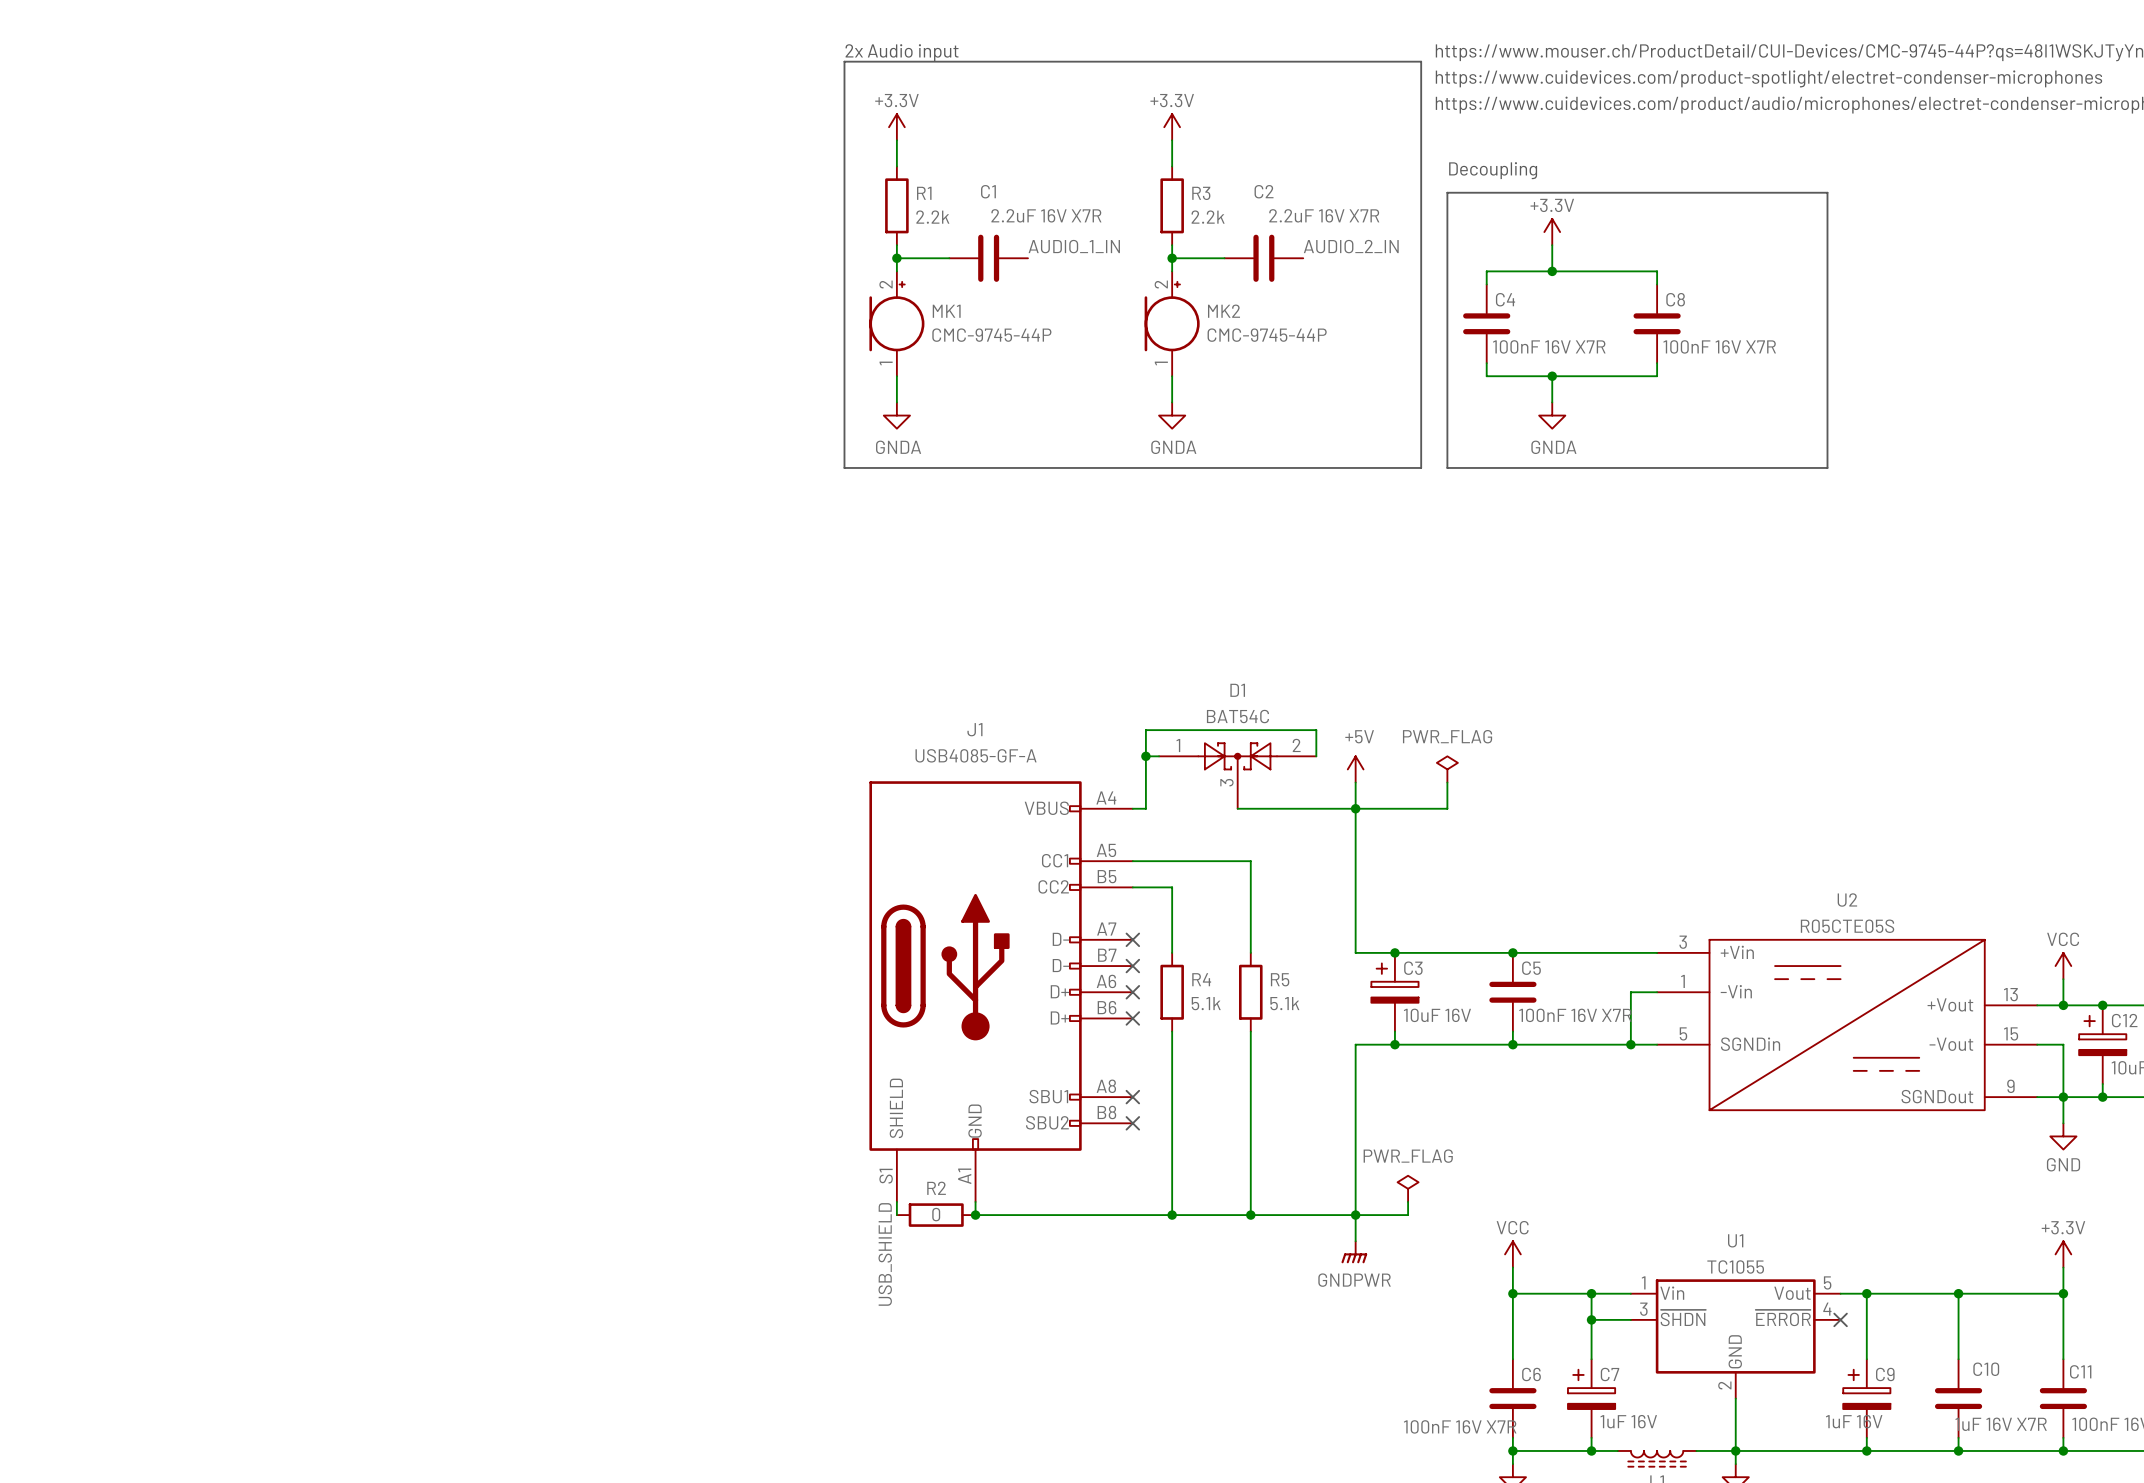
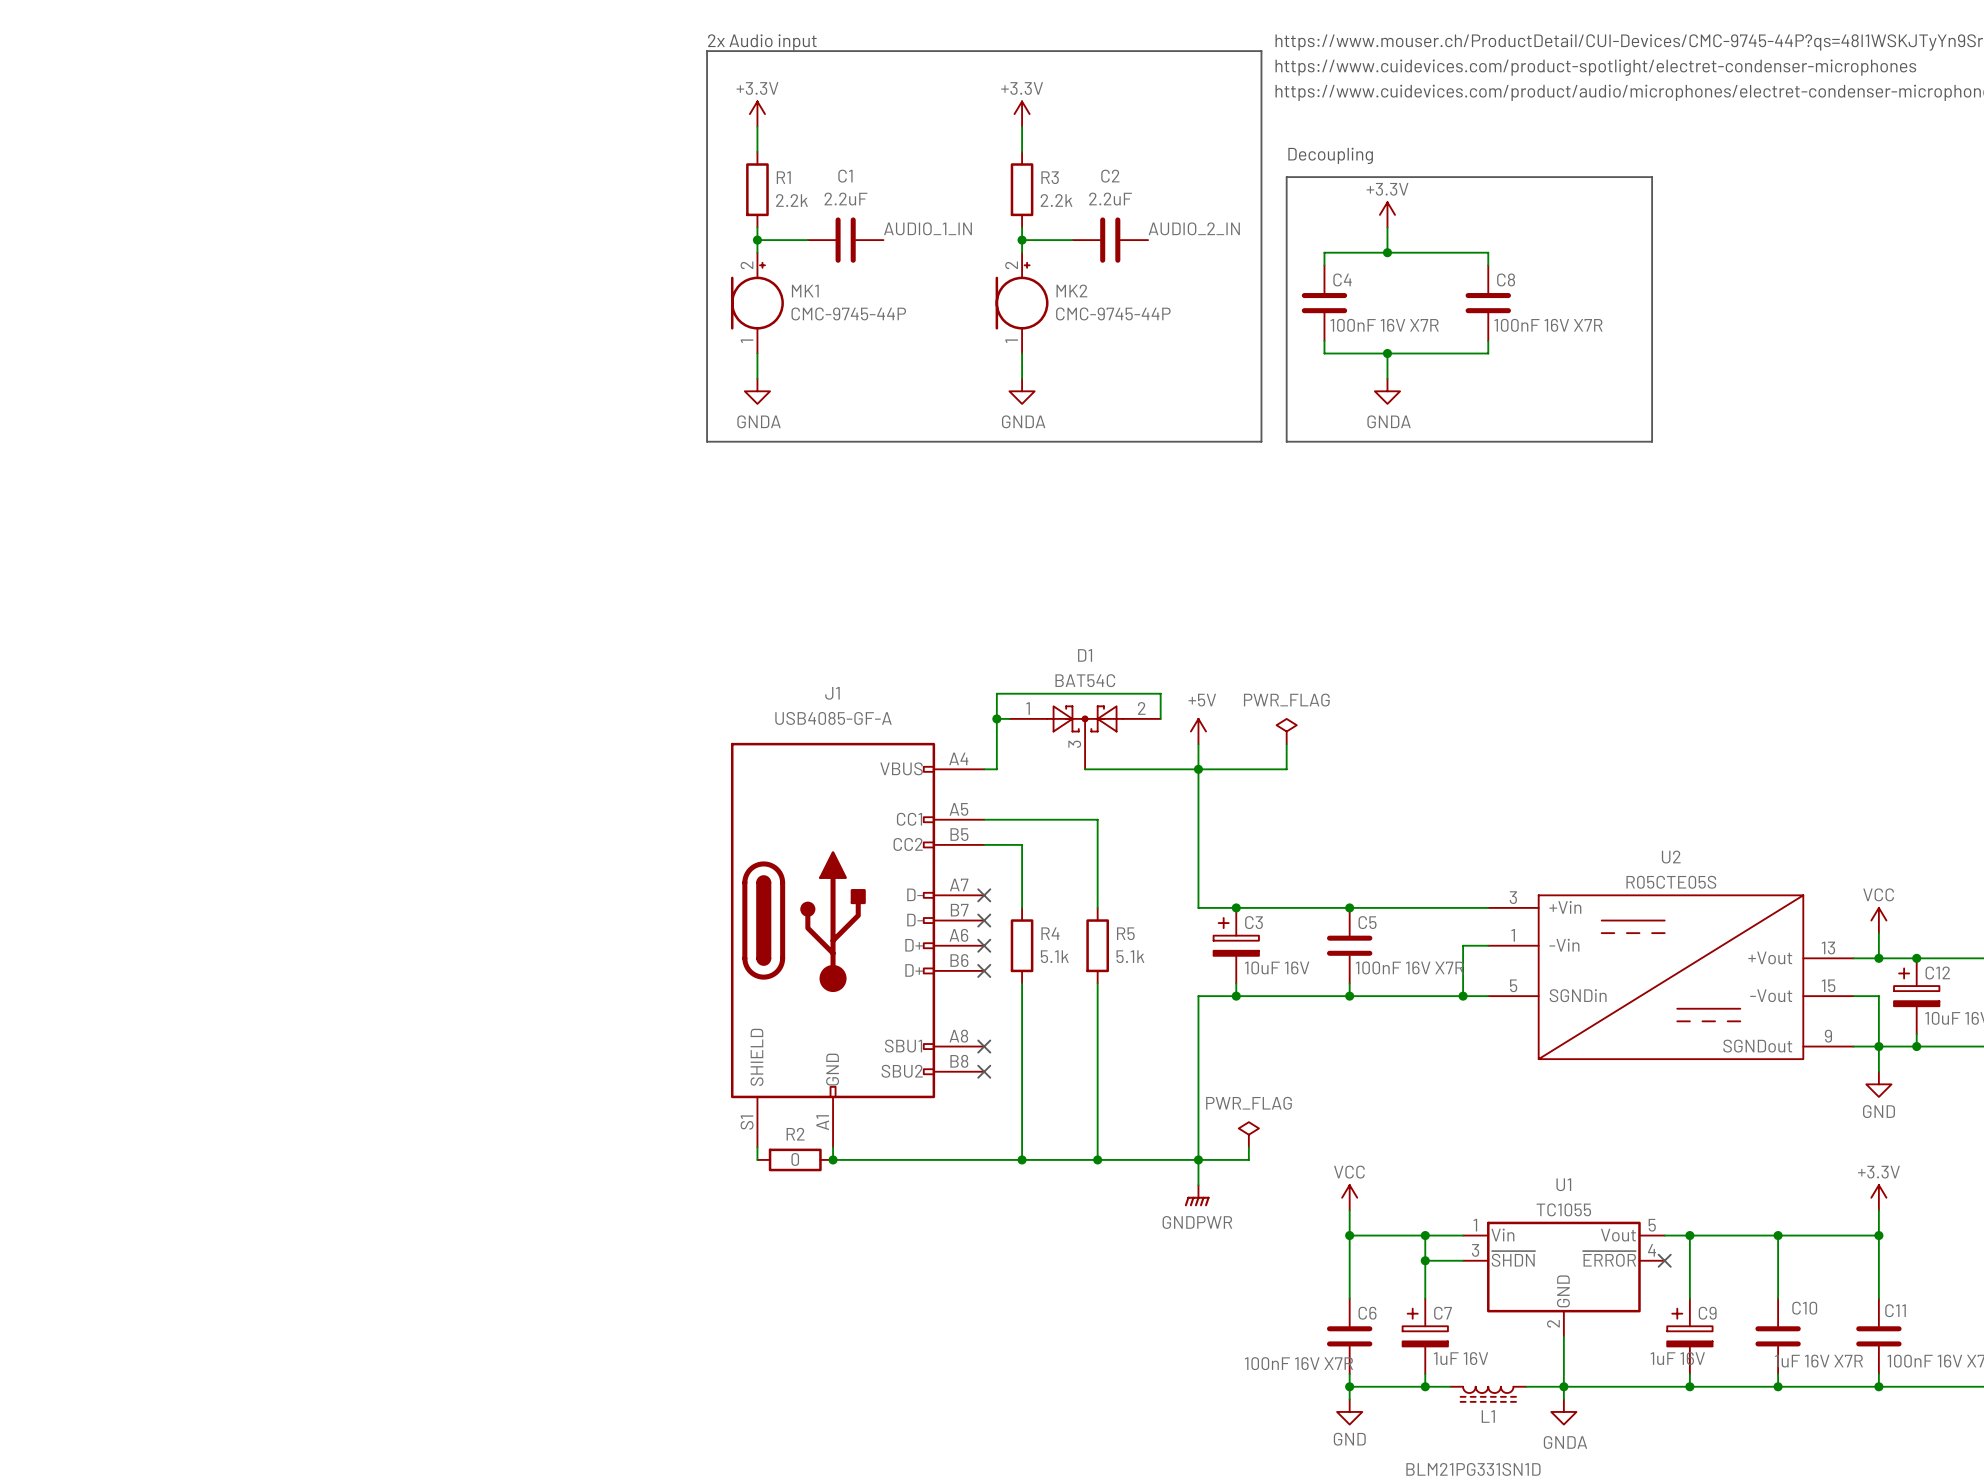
C1 value: 2.2uF 16V X7R (1046, 215) -> 2.2uF (845, 199)
C2 value: 2.2uF 16V X7R (1324, 215) -> 2.2uF (1110, 199)
label: USB_SHIELD (885, 1254) -> none

